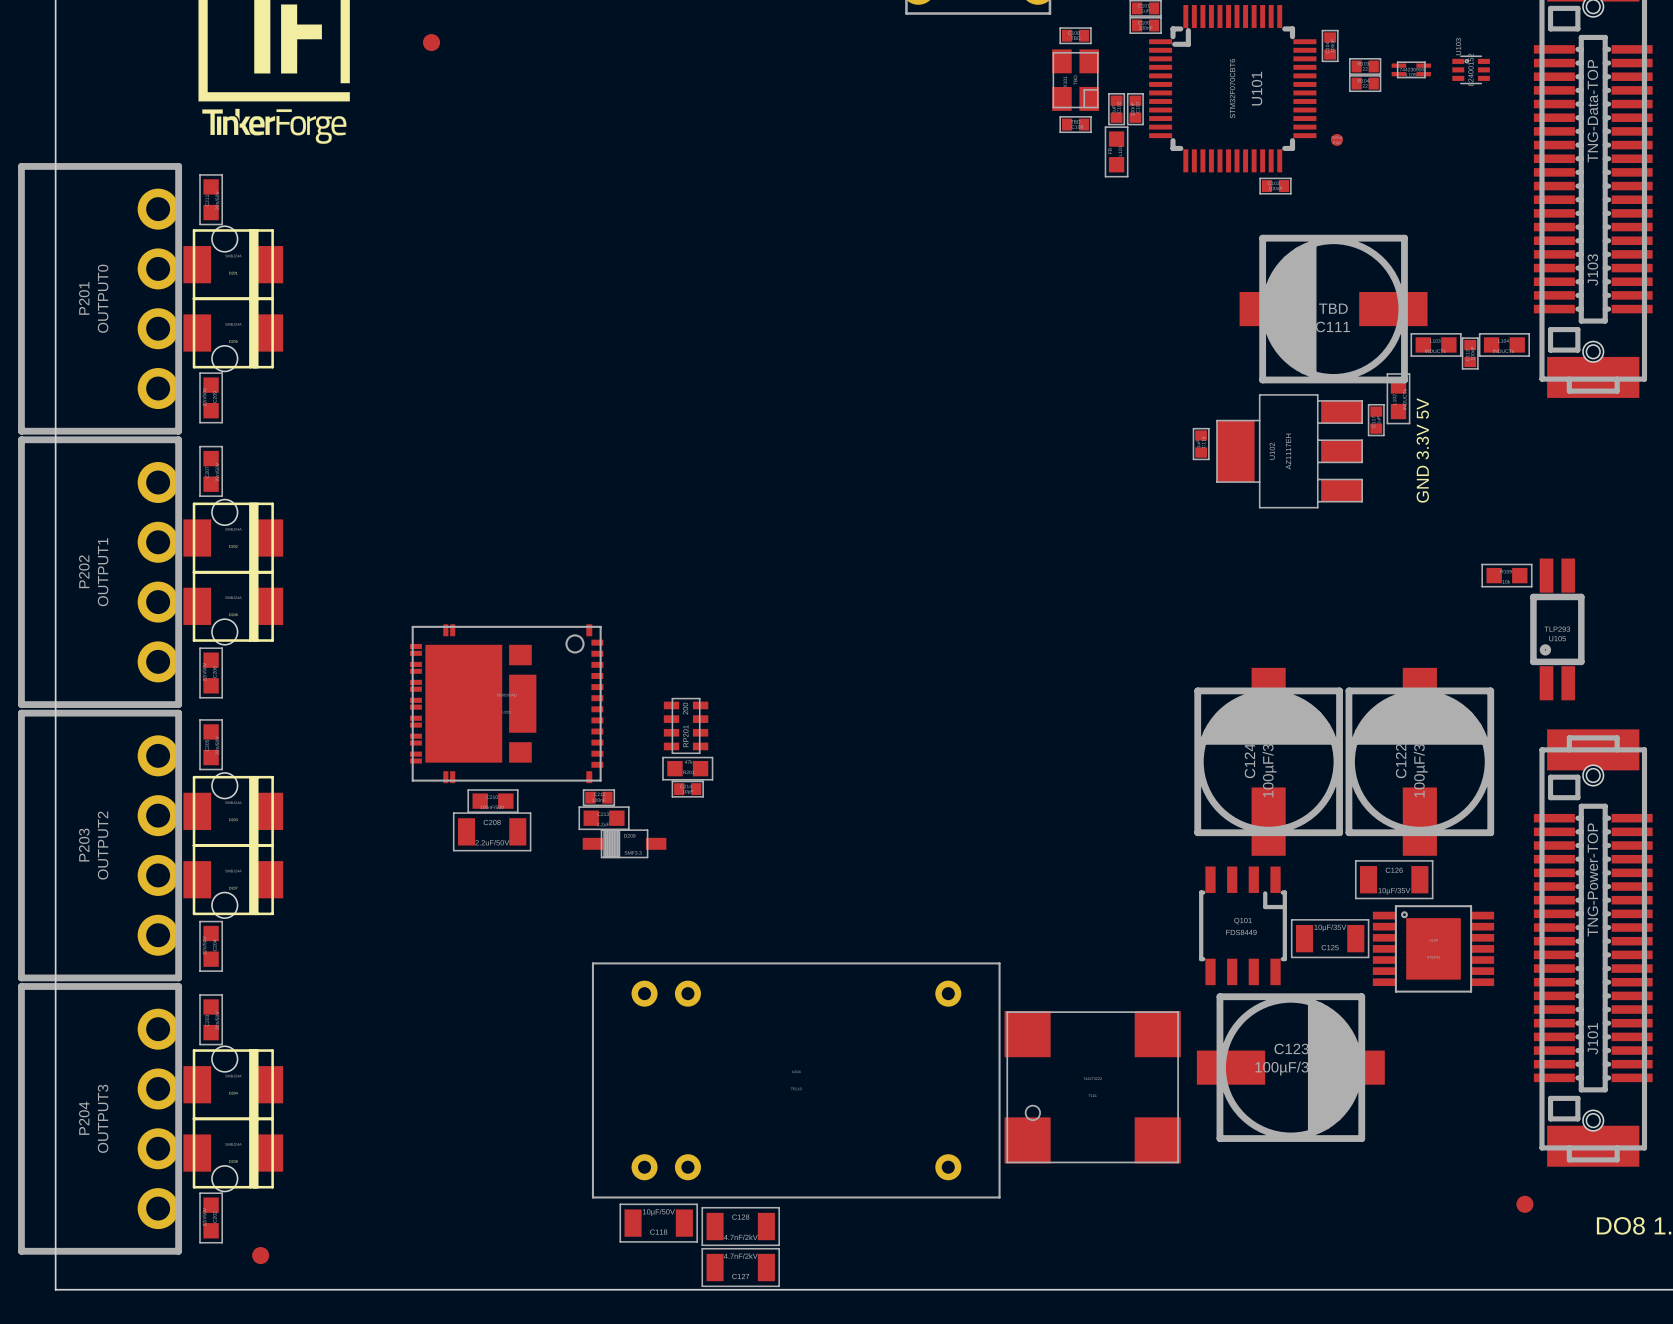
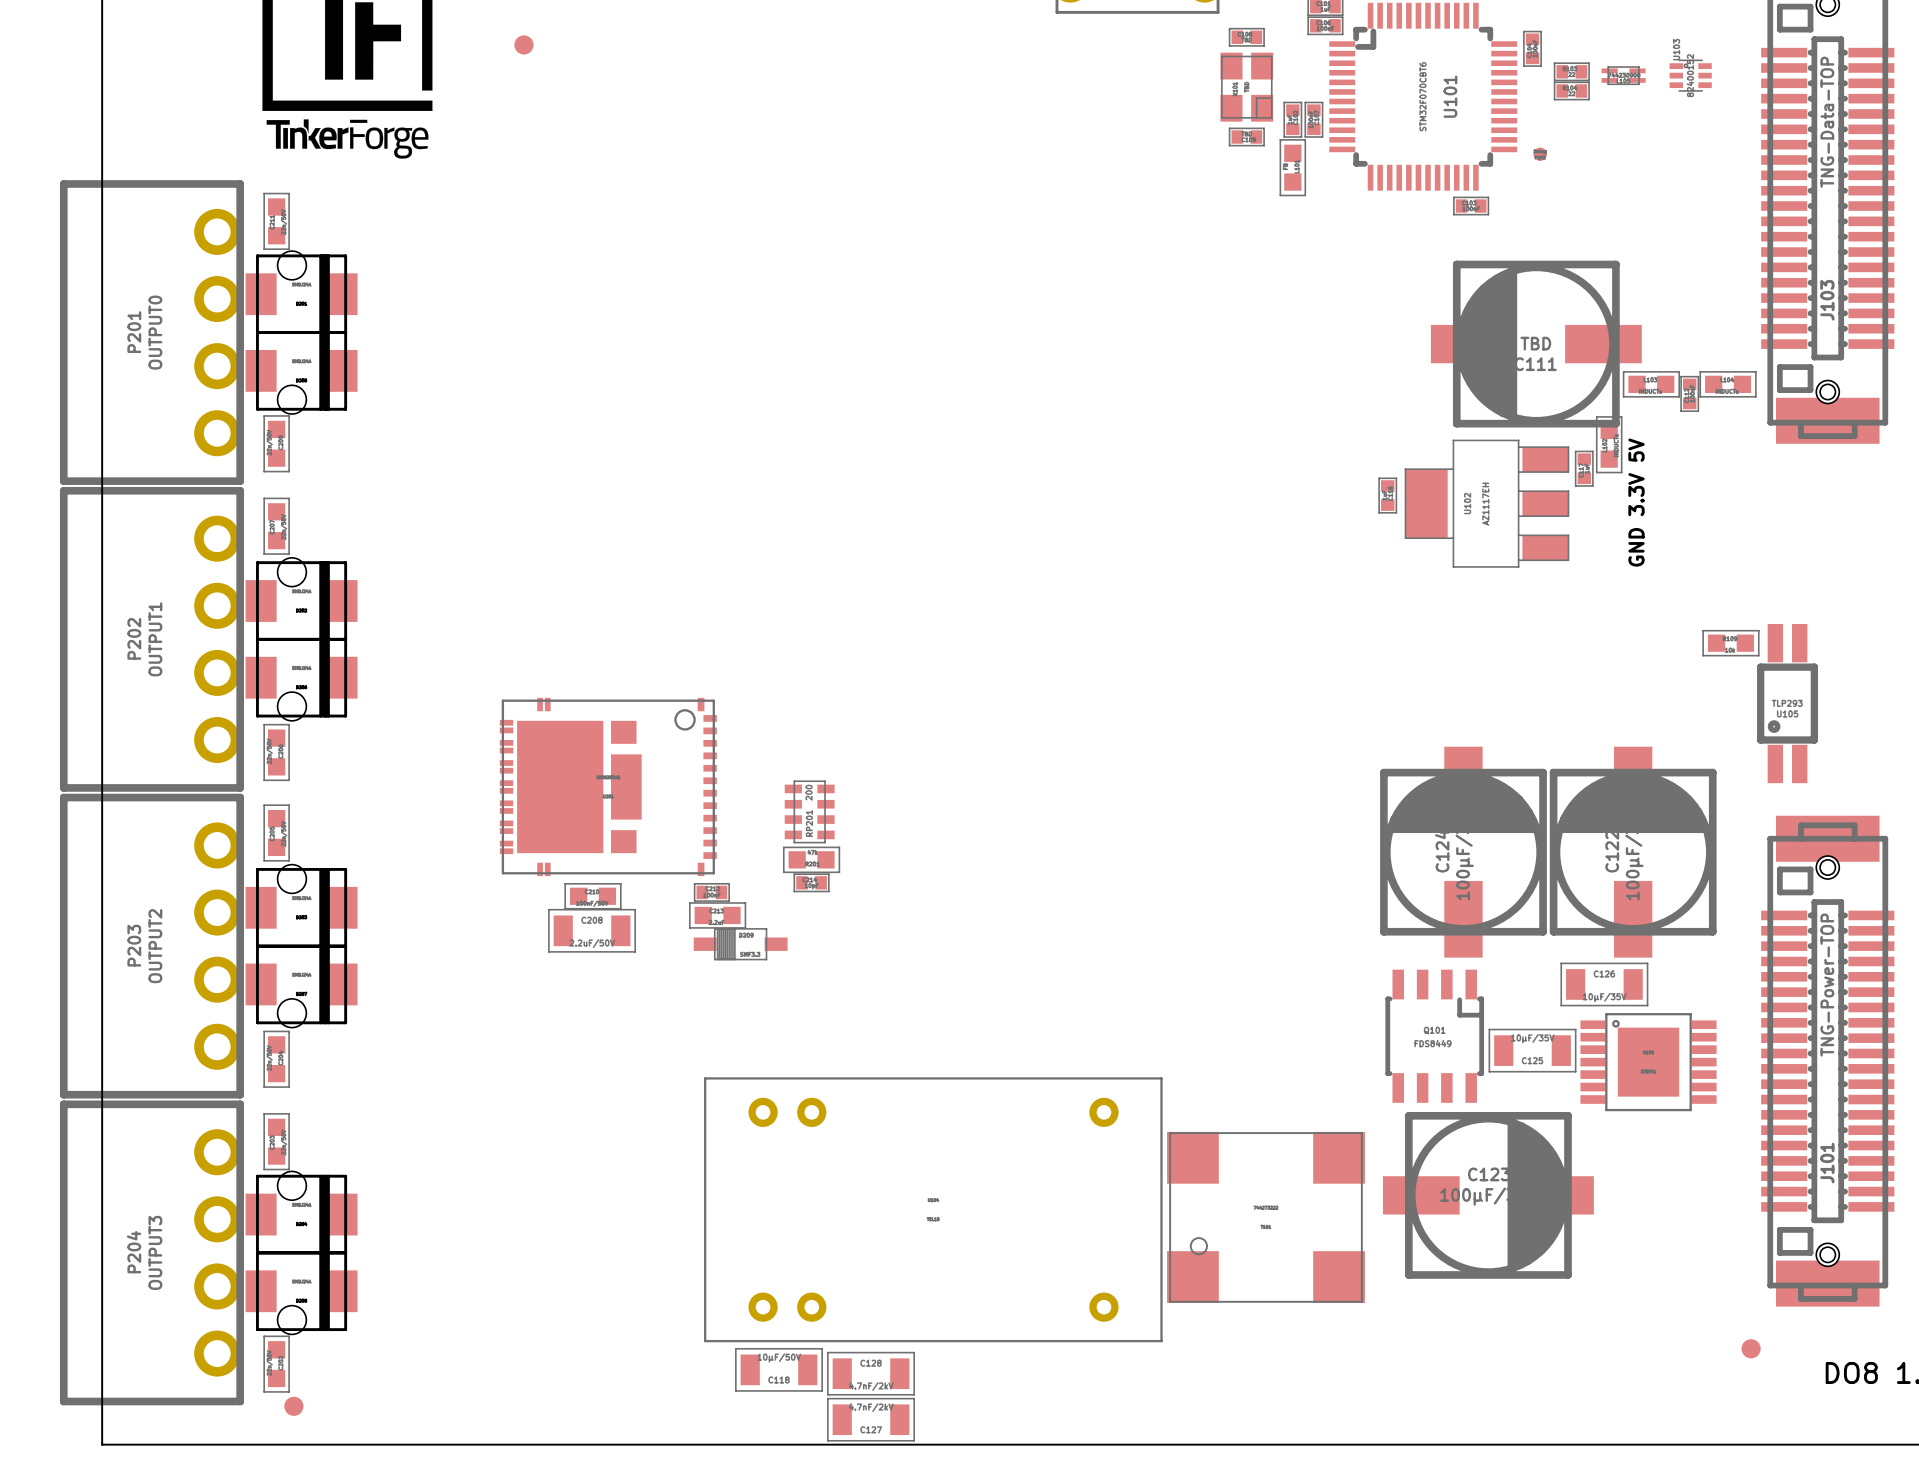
part position: (260, 1255) -> (293, 1406)

